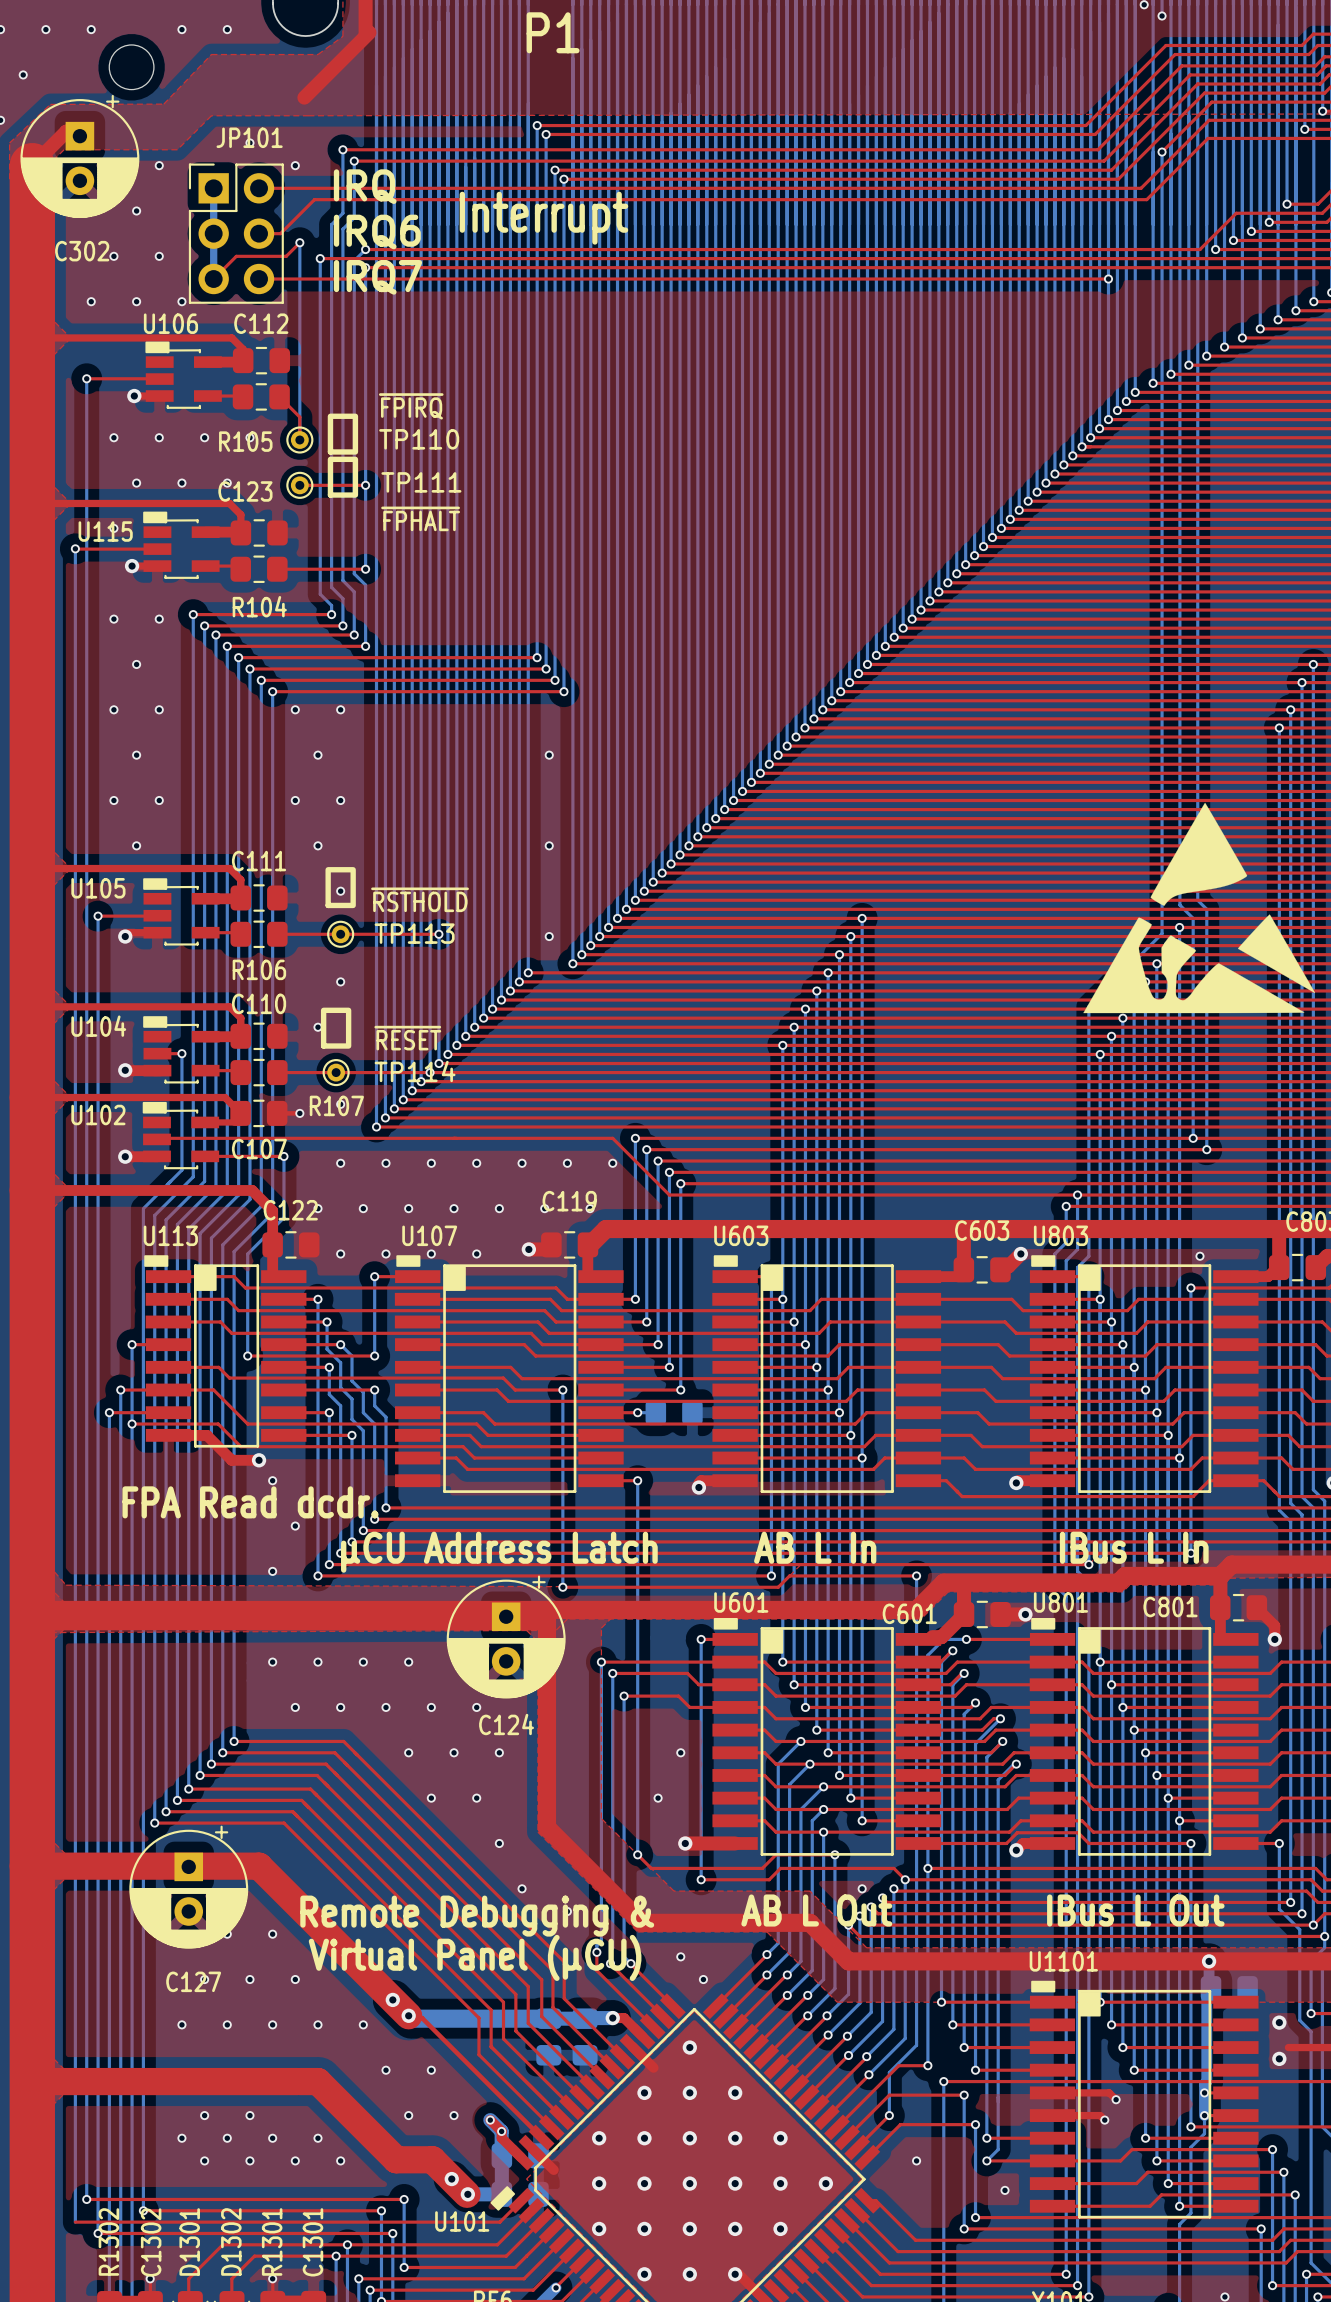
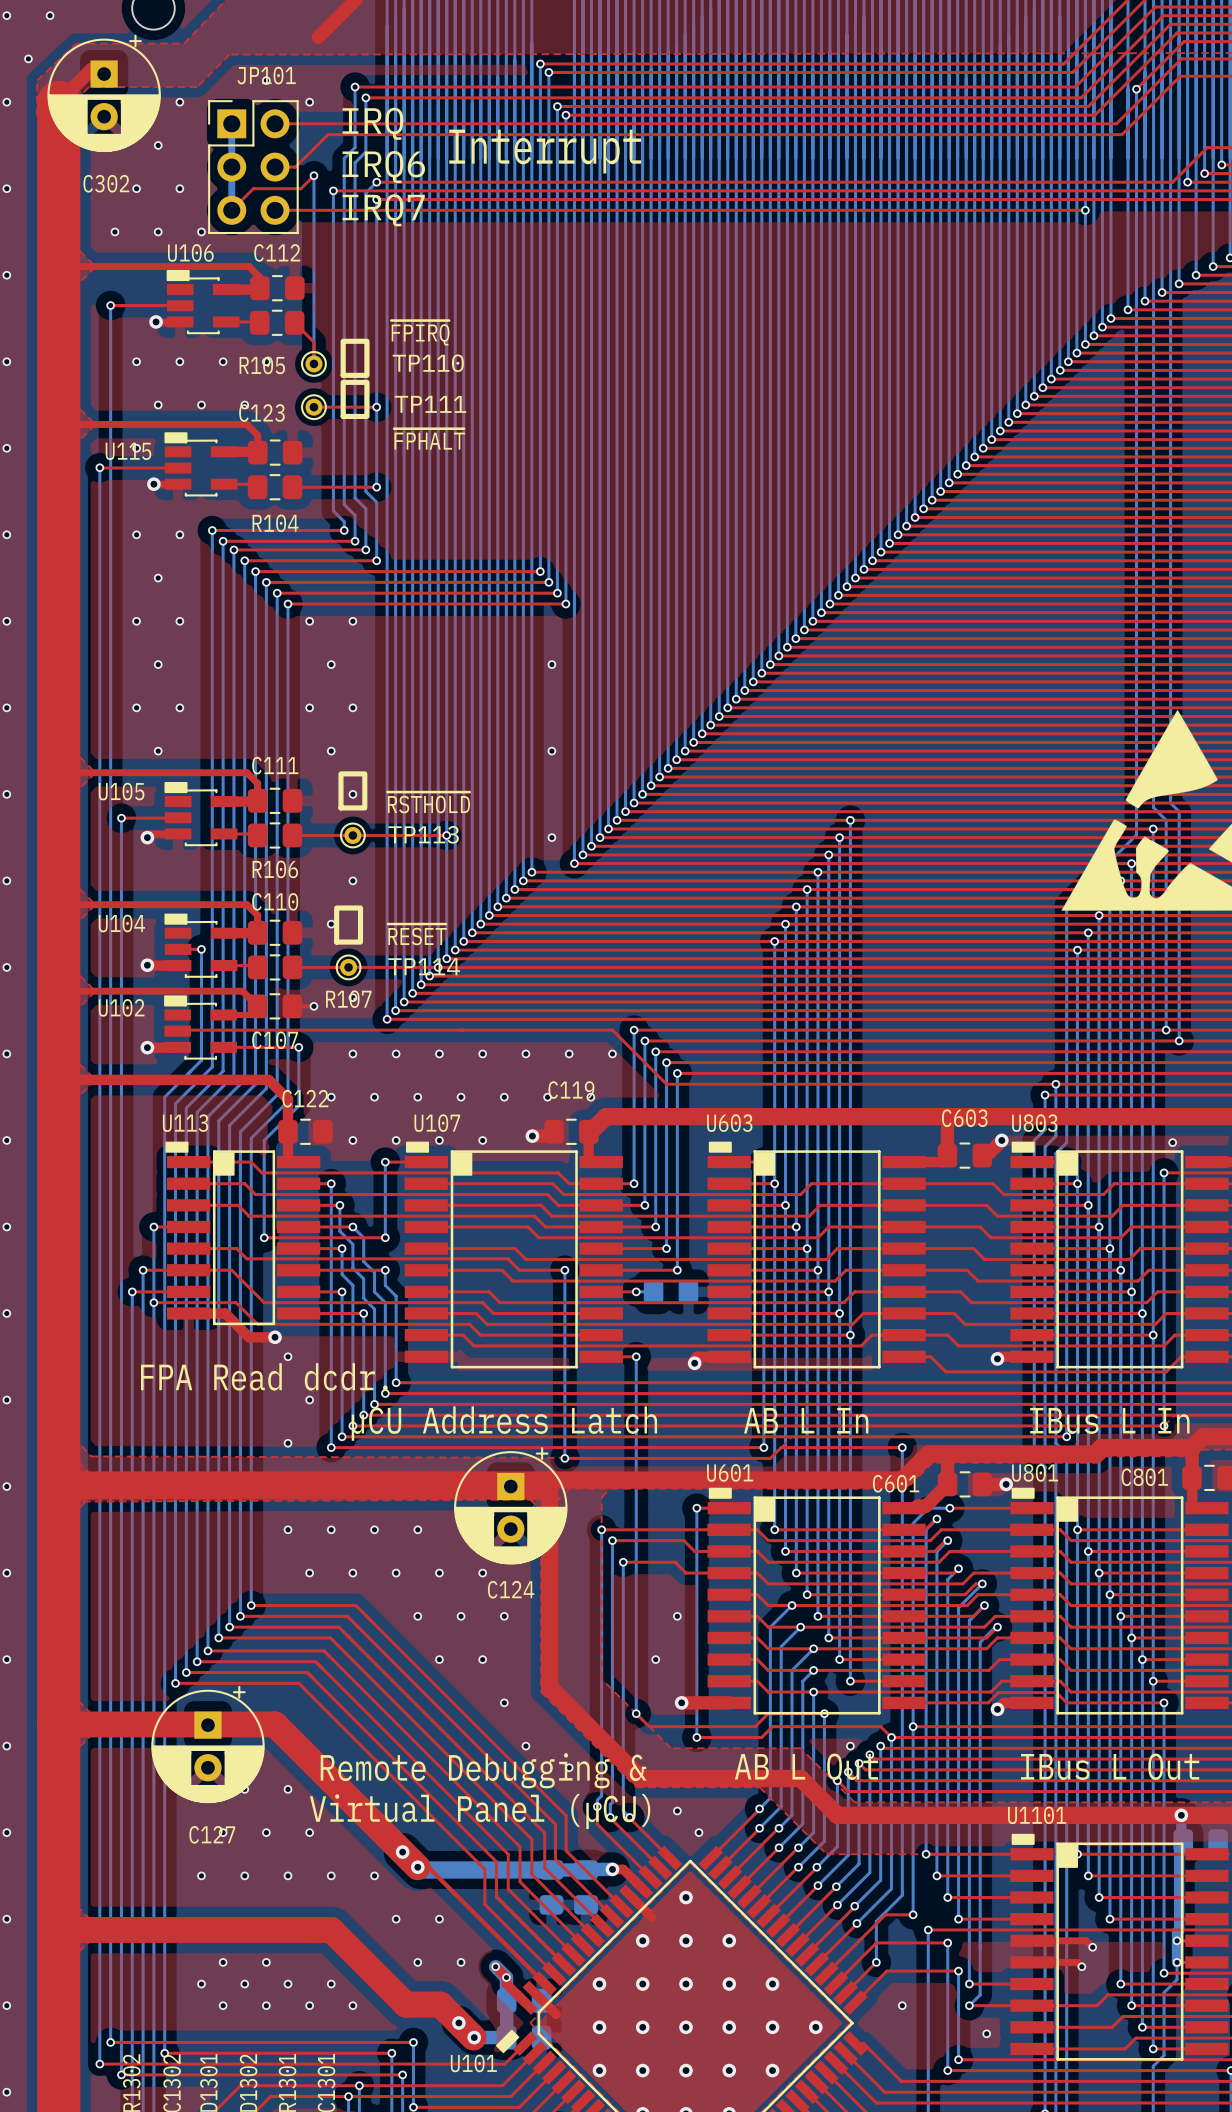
via: none -> (99, 2064)

